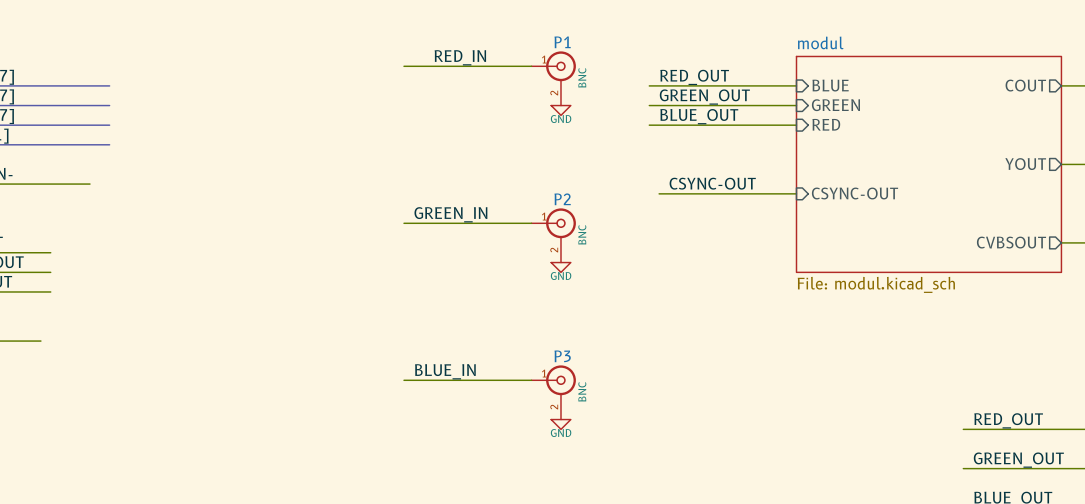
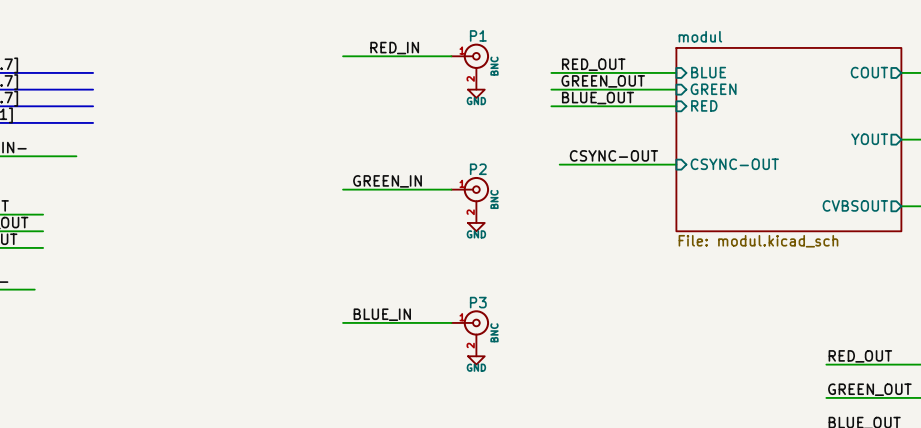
wire: (963, 429) (973, 429) -> none
wire: (963, 468) (973, 468) -> none

